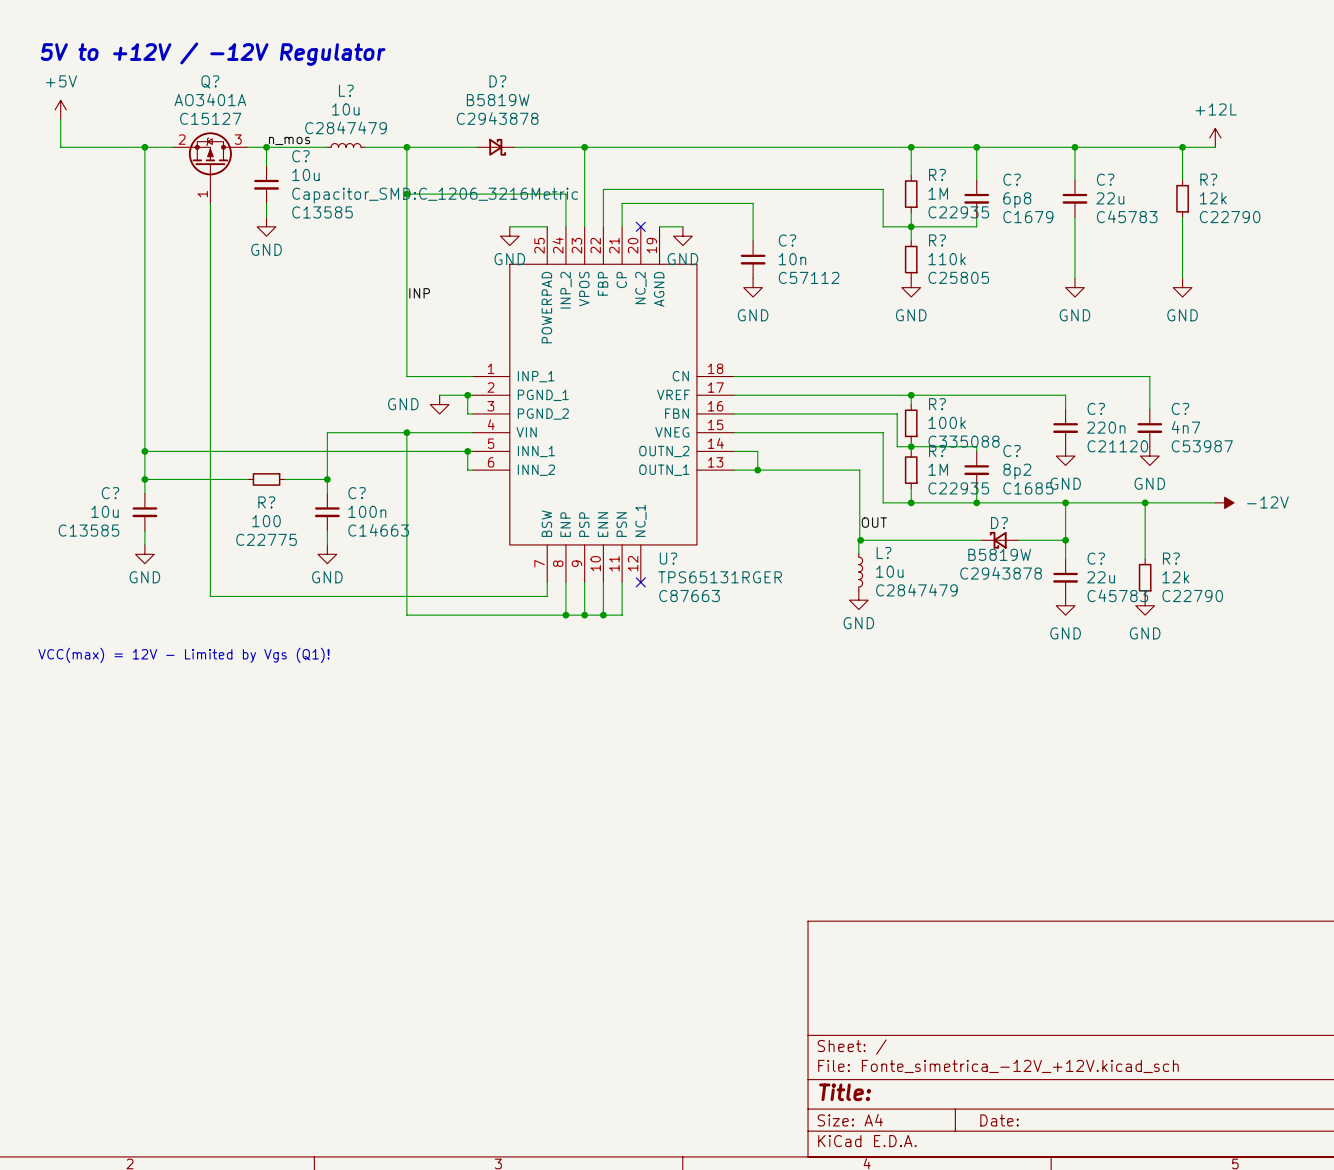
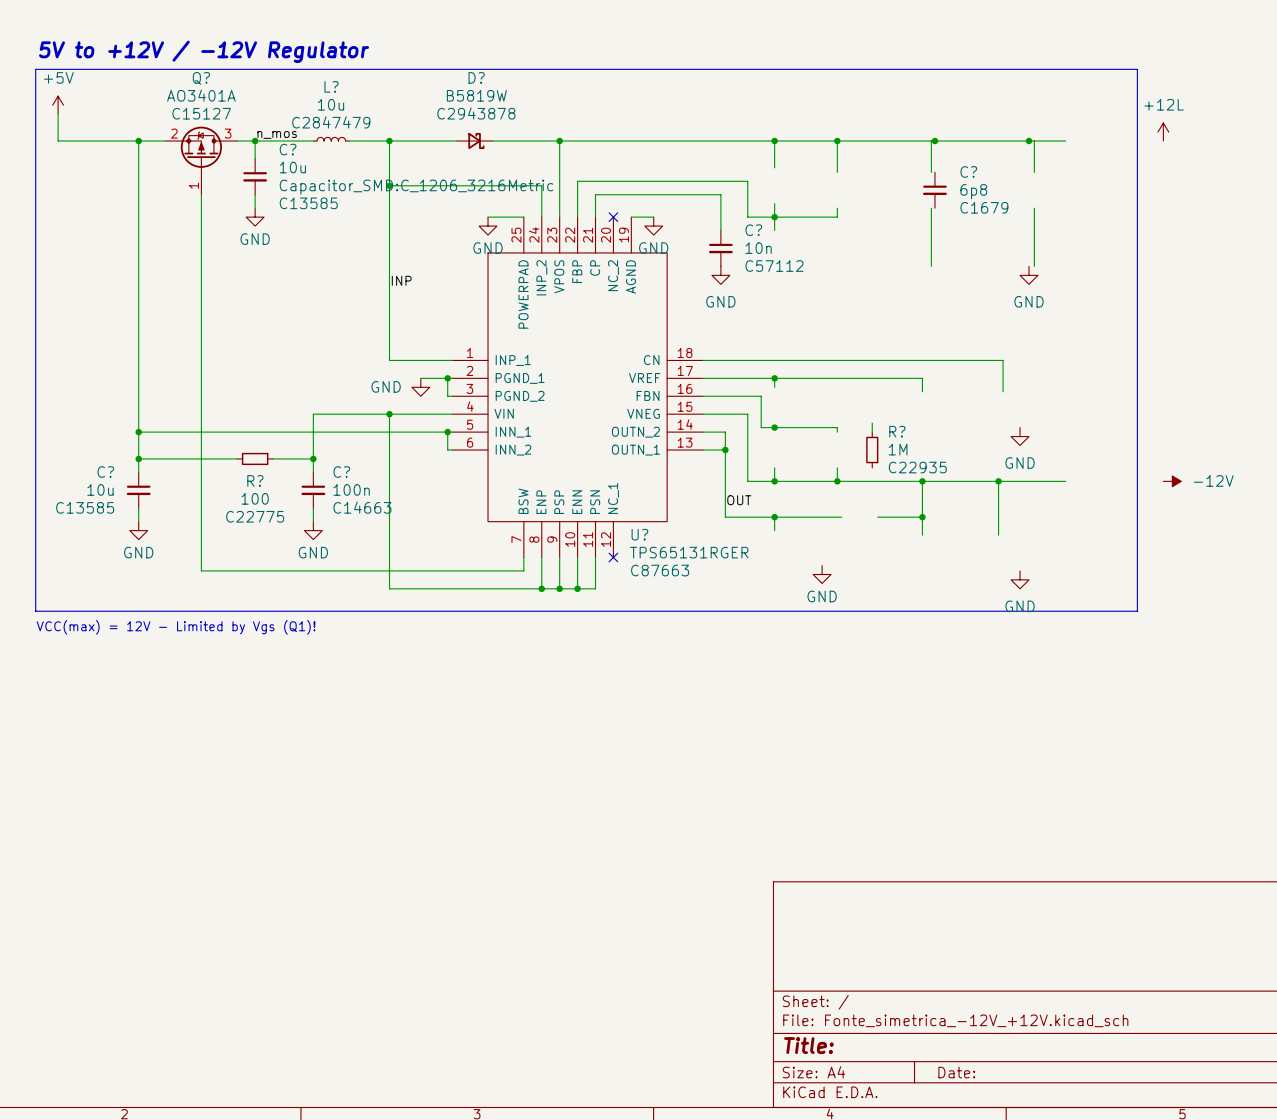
line: none -> (35, 69) (1137, 69) (1137, 611) (35, 611) (35, 69)
junction: none -> (774, 141)
wire: (911, 147) (911, 175) -> (774, 141) (774, 167)
junction position: (911, 147) -> (837, 141)
wire: (976, 147) (976, 180) -> (837, 141) (837, 172)
wire: (1074, 147) (1074, 180) -> (931, 141) (931, 172)
wire: (1113, 147) (1215, 147) -> none
wire: (1182, 147) (1182, 180) -> (1034, 141) (1034, 172)
junction: (1182, 147) -> none
wire: (781, 189) (883, 189) (883, 226) (976, 226) (976, 217) -> (747, 181) (747, 217) (837, 217) (837, 208)
R?: 1M (911, 194) -> none
C?: 22u (1074, 198) -> none
R?: 12k (1182, 198) -> none
wire: (911, 212) (911, 240) -> (774, 203) (774, 230)
wire: (1074, 217) (1074, 278) -> (931, 208) (931, 266)
wire: (1182, 217) (1182, 278) -> (1034, 208) (1034, 266)
junction: none -> (774, 217)
junction: (911, 226) -> none
R?: 110k (911, 259) -> none
power symbol: GND (911, 287) -> none
power symbol: GND (1182, 287) -> none
wire: (1047, 376) (1149, 376) (1149, 409) -> (1003, 360) (1003, 391)
junction: none -> (774, 378)
wire: (911, 395) (911, 404) -> (774, 378) (774, 387)
junction: (911, 395) -> none
wire: (963, 395) (1065, 395) (1065, 409) -> (922, 378) (922, 391)
wire: (795, 413) (897, 413) (897, 446) (976, 446) (976, 451) -> (761, 396) (761, 427) (837, 427) (837, 432)
R?: 100k (911, 423) -> none
C?: 220n (1065, 428) -> none
C?: 4n7 (1149, 428) -> none
wire: (781, 432) (883, 432) (883, 502) -> (747, 414) (747, 481) (845, 481)
junction: none -> (774, 427)
junction: (911, 446) -> none
power symbol: GND (1149, 456) -> none
wire: (757, 470) (859, 470) (859, 540) -> (725, 450) (725, 517) (823, 517)
C?: 8p2 (976, 470) -> none
wire: (911, 488) (911, 502) -> (774, 467) (774, 481)
wire: (976, 488) (976, 502) -> (837, 467) (837, 481)
junction: none -> (774, 481)
junction: none -> (837, 481)
junction: (911, 502) -> none
junction position: (976, 502) -> (922, 481)
junction: none -> (998, 481)
wire: (1065, 502) (1065, 559) -> (922, 481) (922, 535)
junction: (1065, 502) -> none
wire: (1113, 502) (1215, 502) -> none
wire: (1145, 502) (1145, 559) -> (998, 481) (998, 535)
junction: (1145, 502) -> none
label position: OUT (874, 522) -> OUT (739, 500)
wire: none -> (774, 517) (774, 530)
junction: none -> (774, 517)
wire: (860, 540) (858, 539) (858, 553) -> none
junction: (860, 540) -> none
wire: (879, 540) (916, 540) -> none
wire: (963, 540) (981, 540) -> none
junction: none -> (922, 517)
D?: B5819W (1000, 540) -> none
wire: (1018, 540) (1065, 540) -> none
junction: (1065, 540) -> none
L?: 10u (860, 572) -> none
C?: 22u (1065, 577) -> none
R?: 12k (1145, 577) -> none
power symbol: GND (1145, 605) -> none

